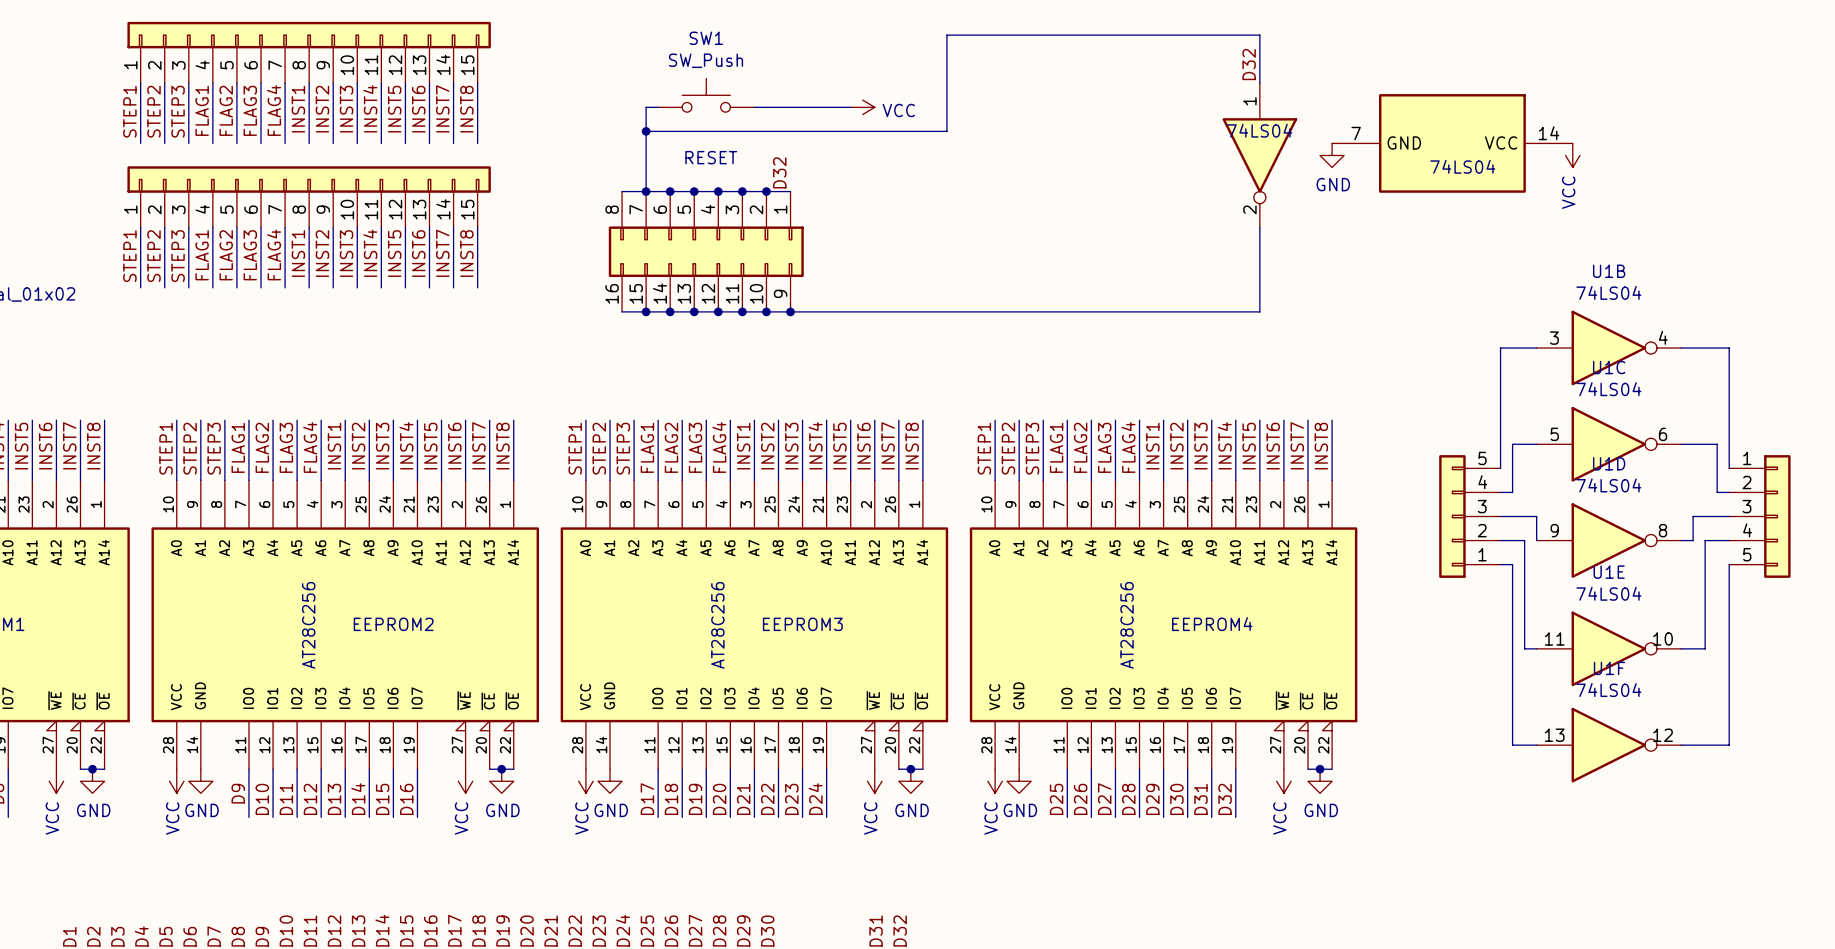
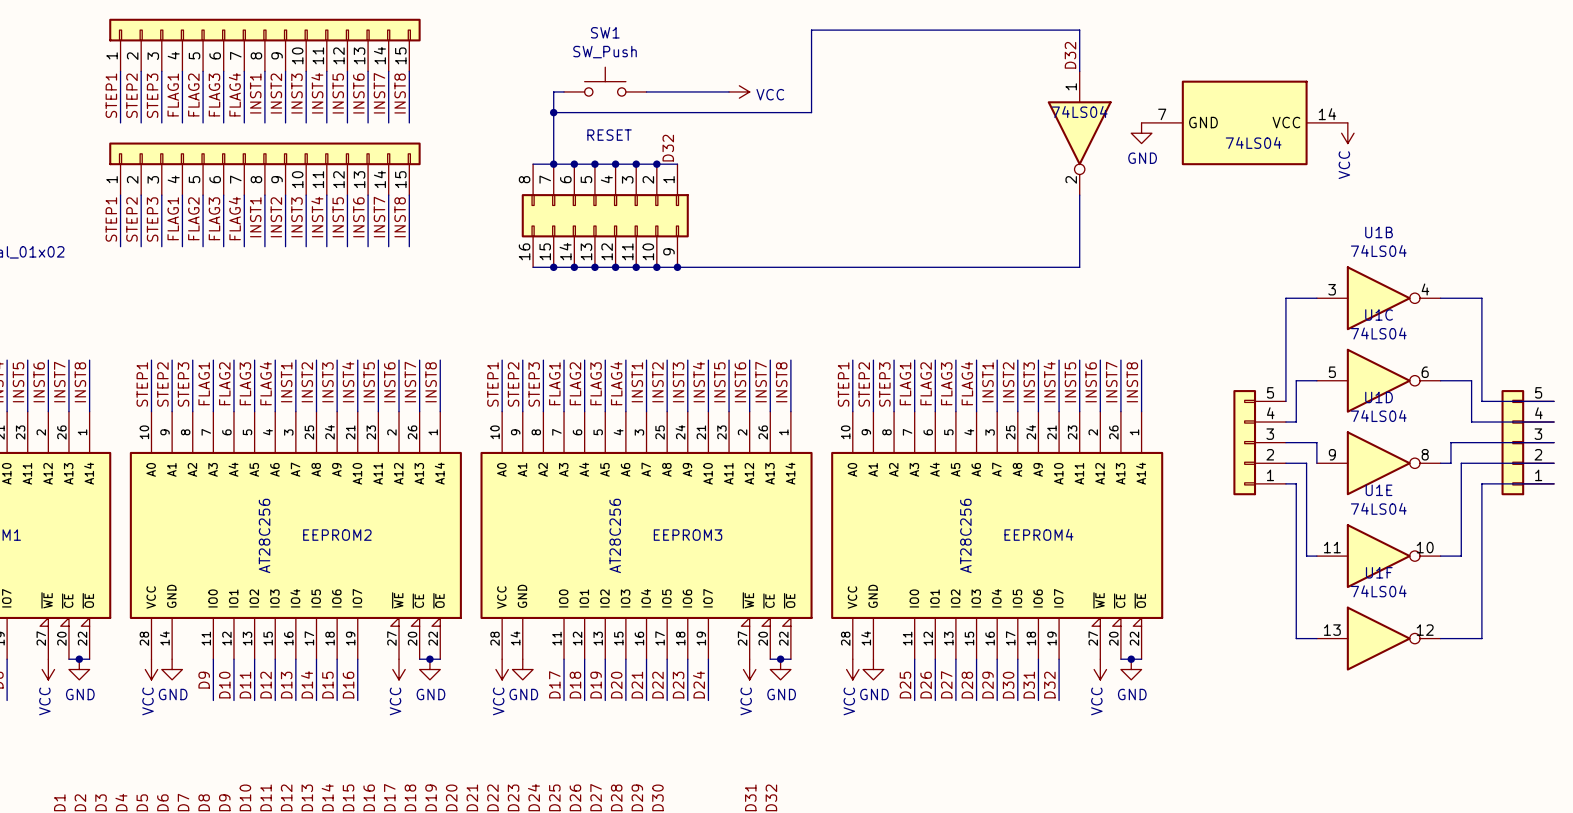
part rotation: 0° (1777, 516) -> 180° (1512, 442)

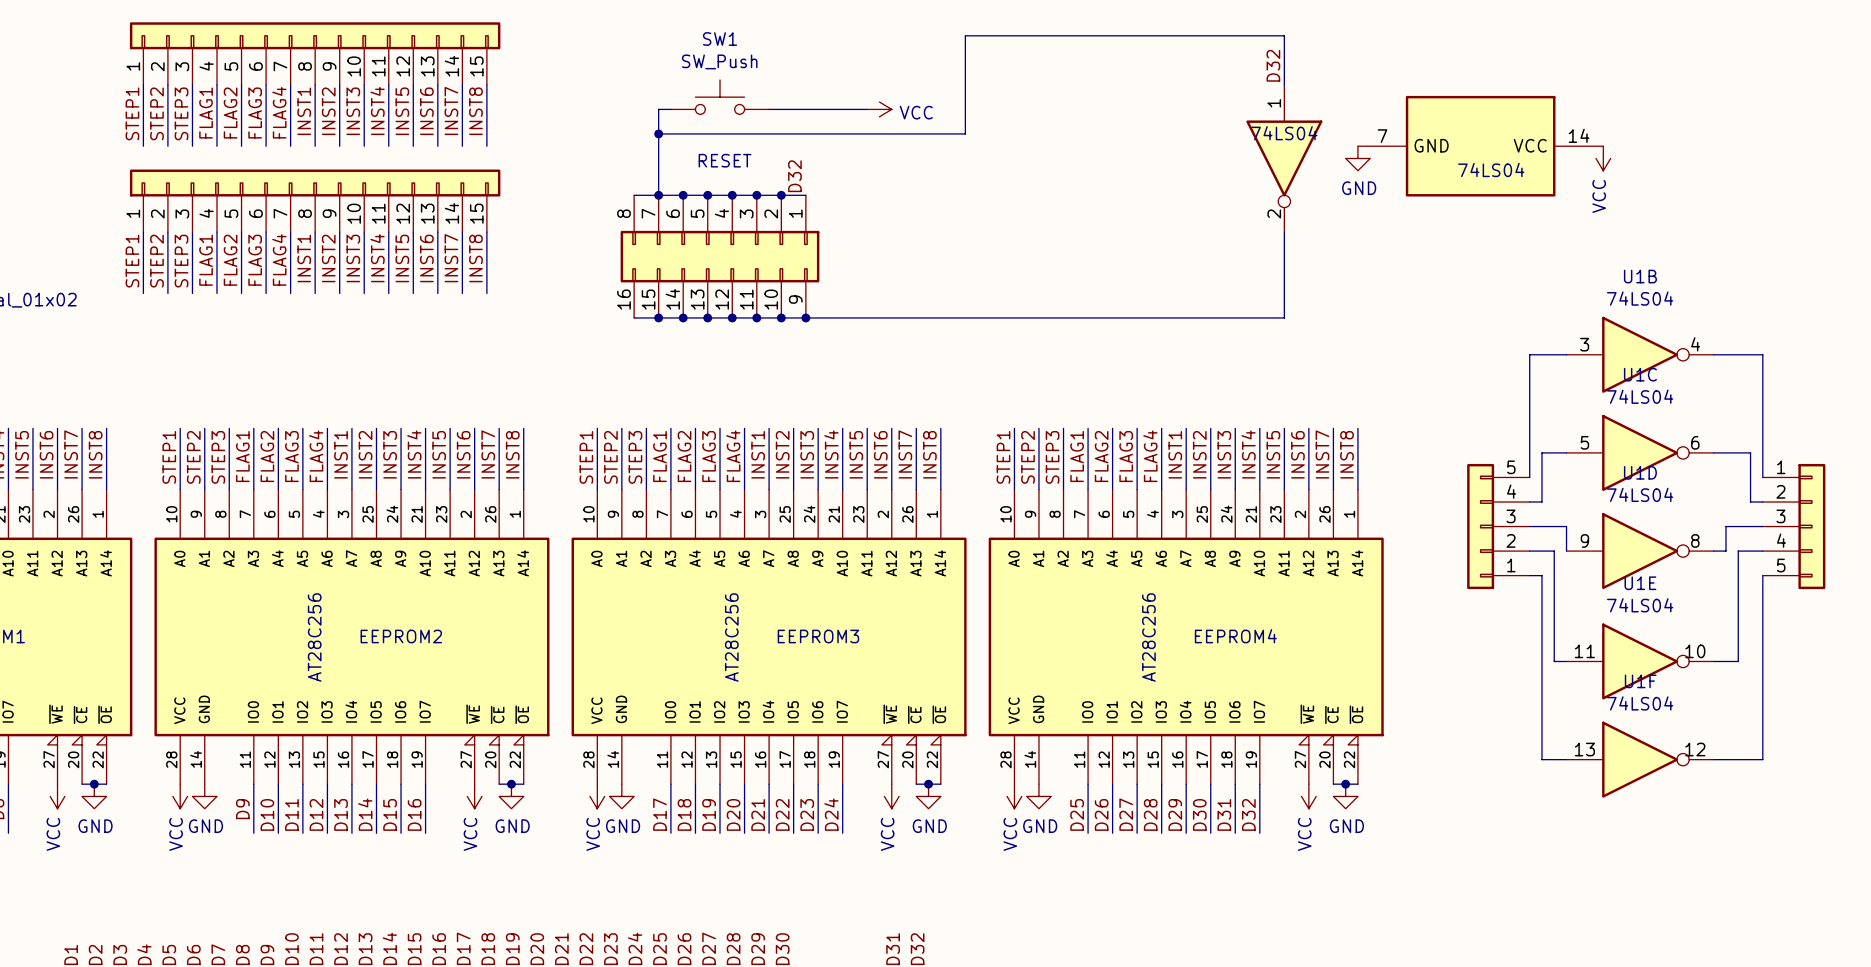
part rotation: 0° (1512, 442) -> 180° (1811, 526)

